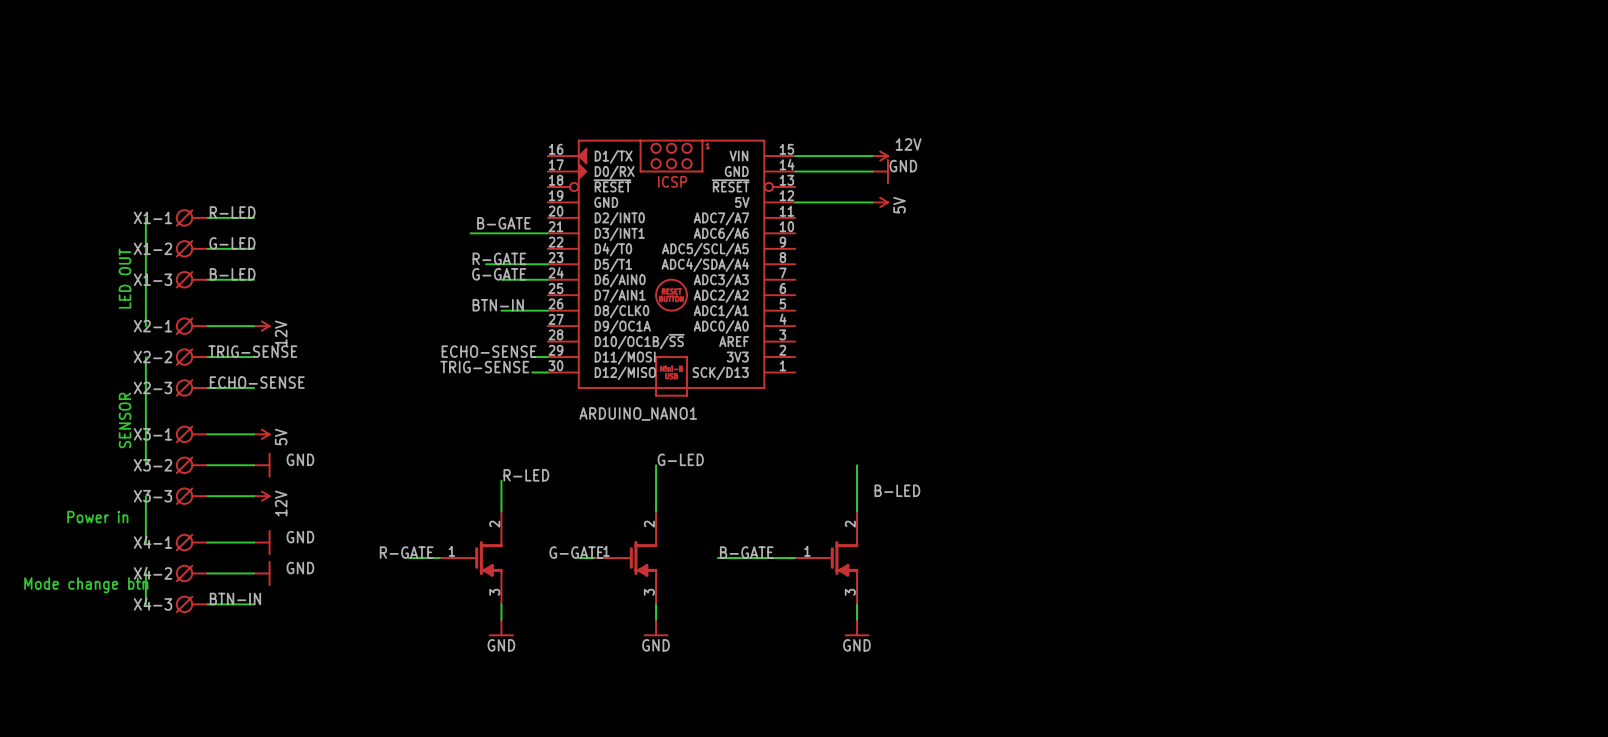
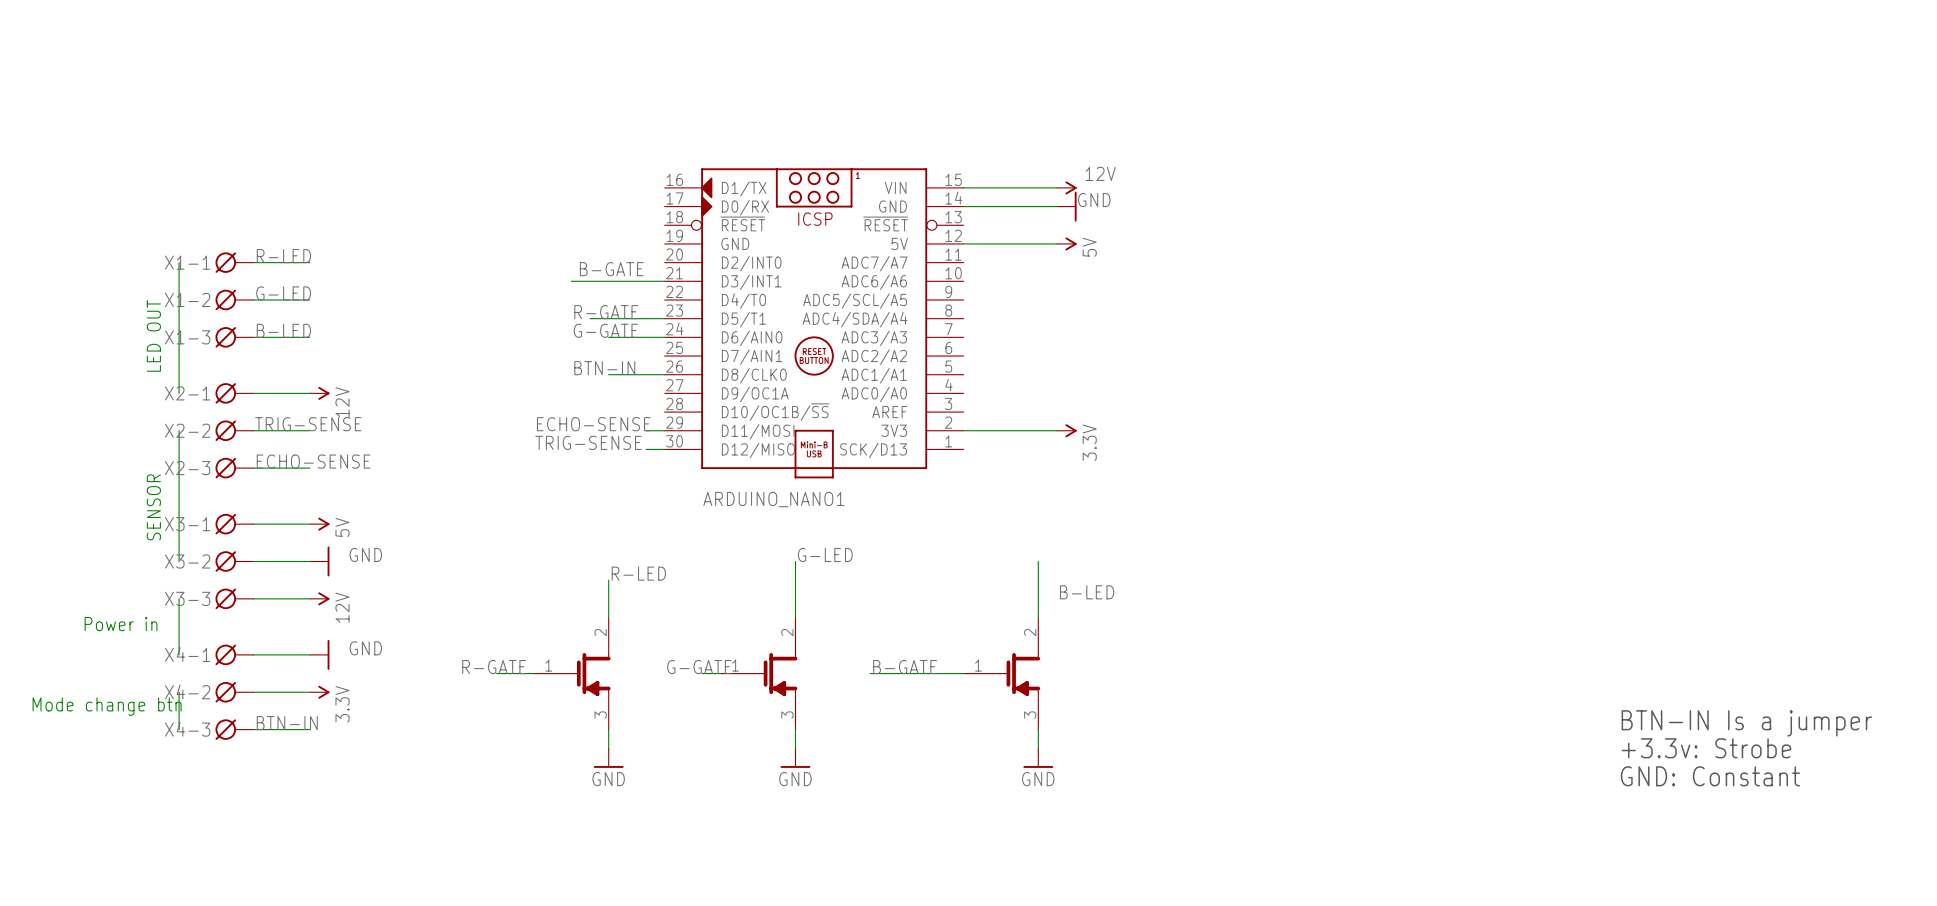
wire: none -> (963, 430) (1057, 430)
power symbol: none -> 3.3V (1066, 430)
power symbol: GND (262, 573) -> 3.3V (319, 692)
text: none -> BTN-IN Is a jumper (1746, 723)
text: none -> +3.3v: Strobe (1706, 748)
text: none -> GND: Constant (1710, 776)

